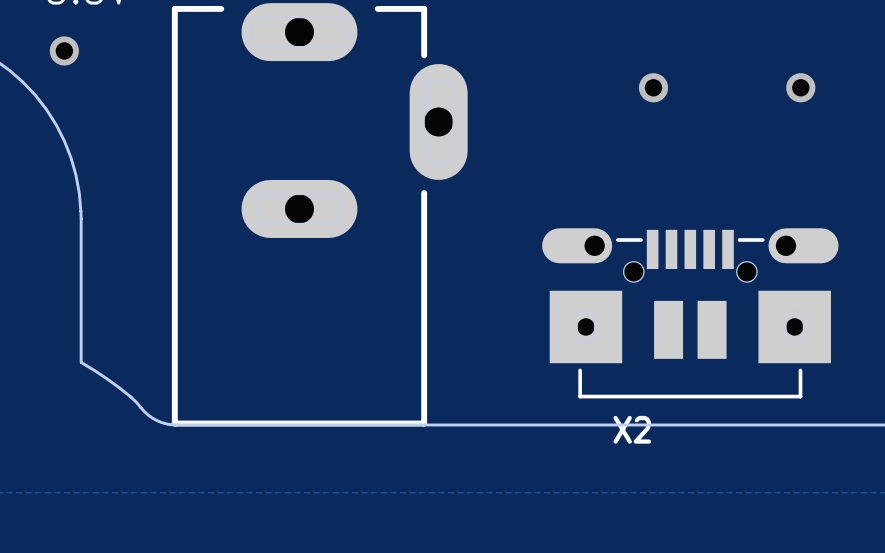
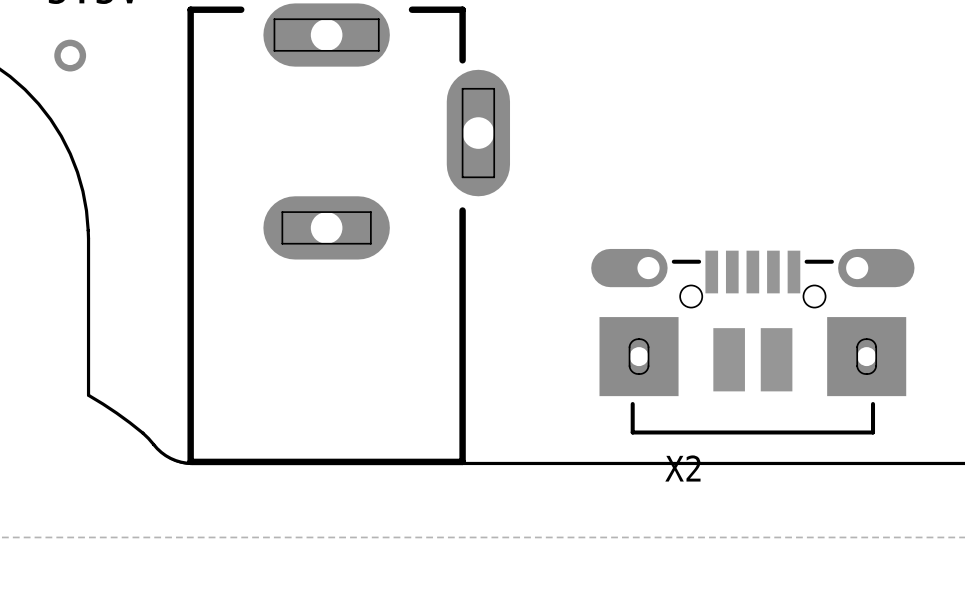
via: (653, 87) -> none
via: (800, 87) -> none

